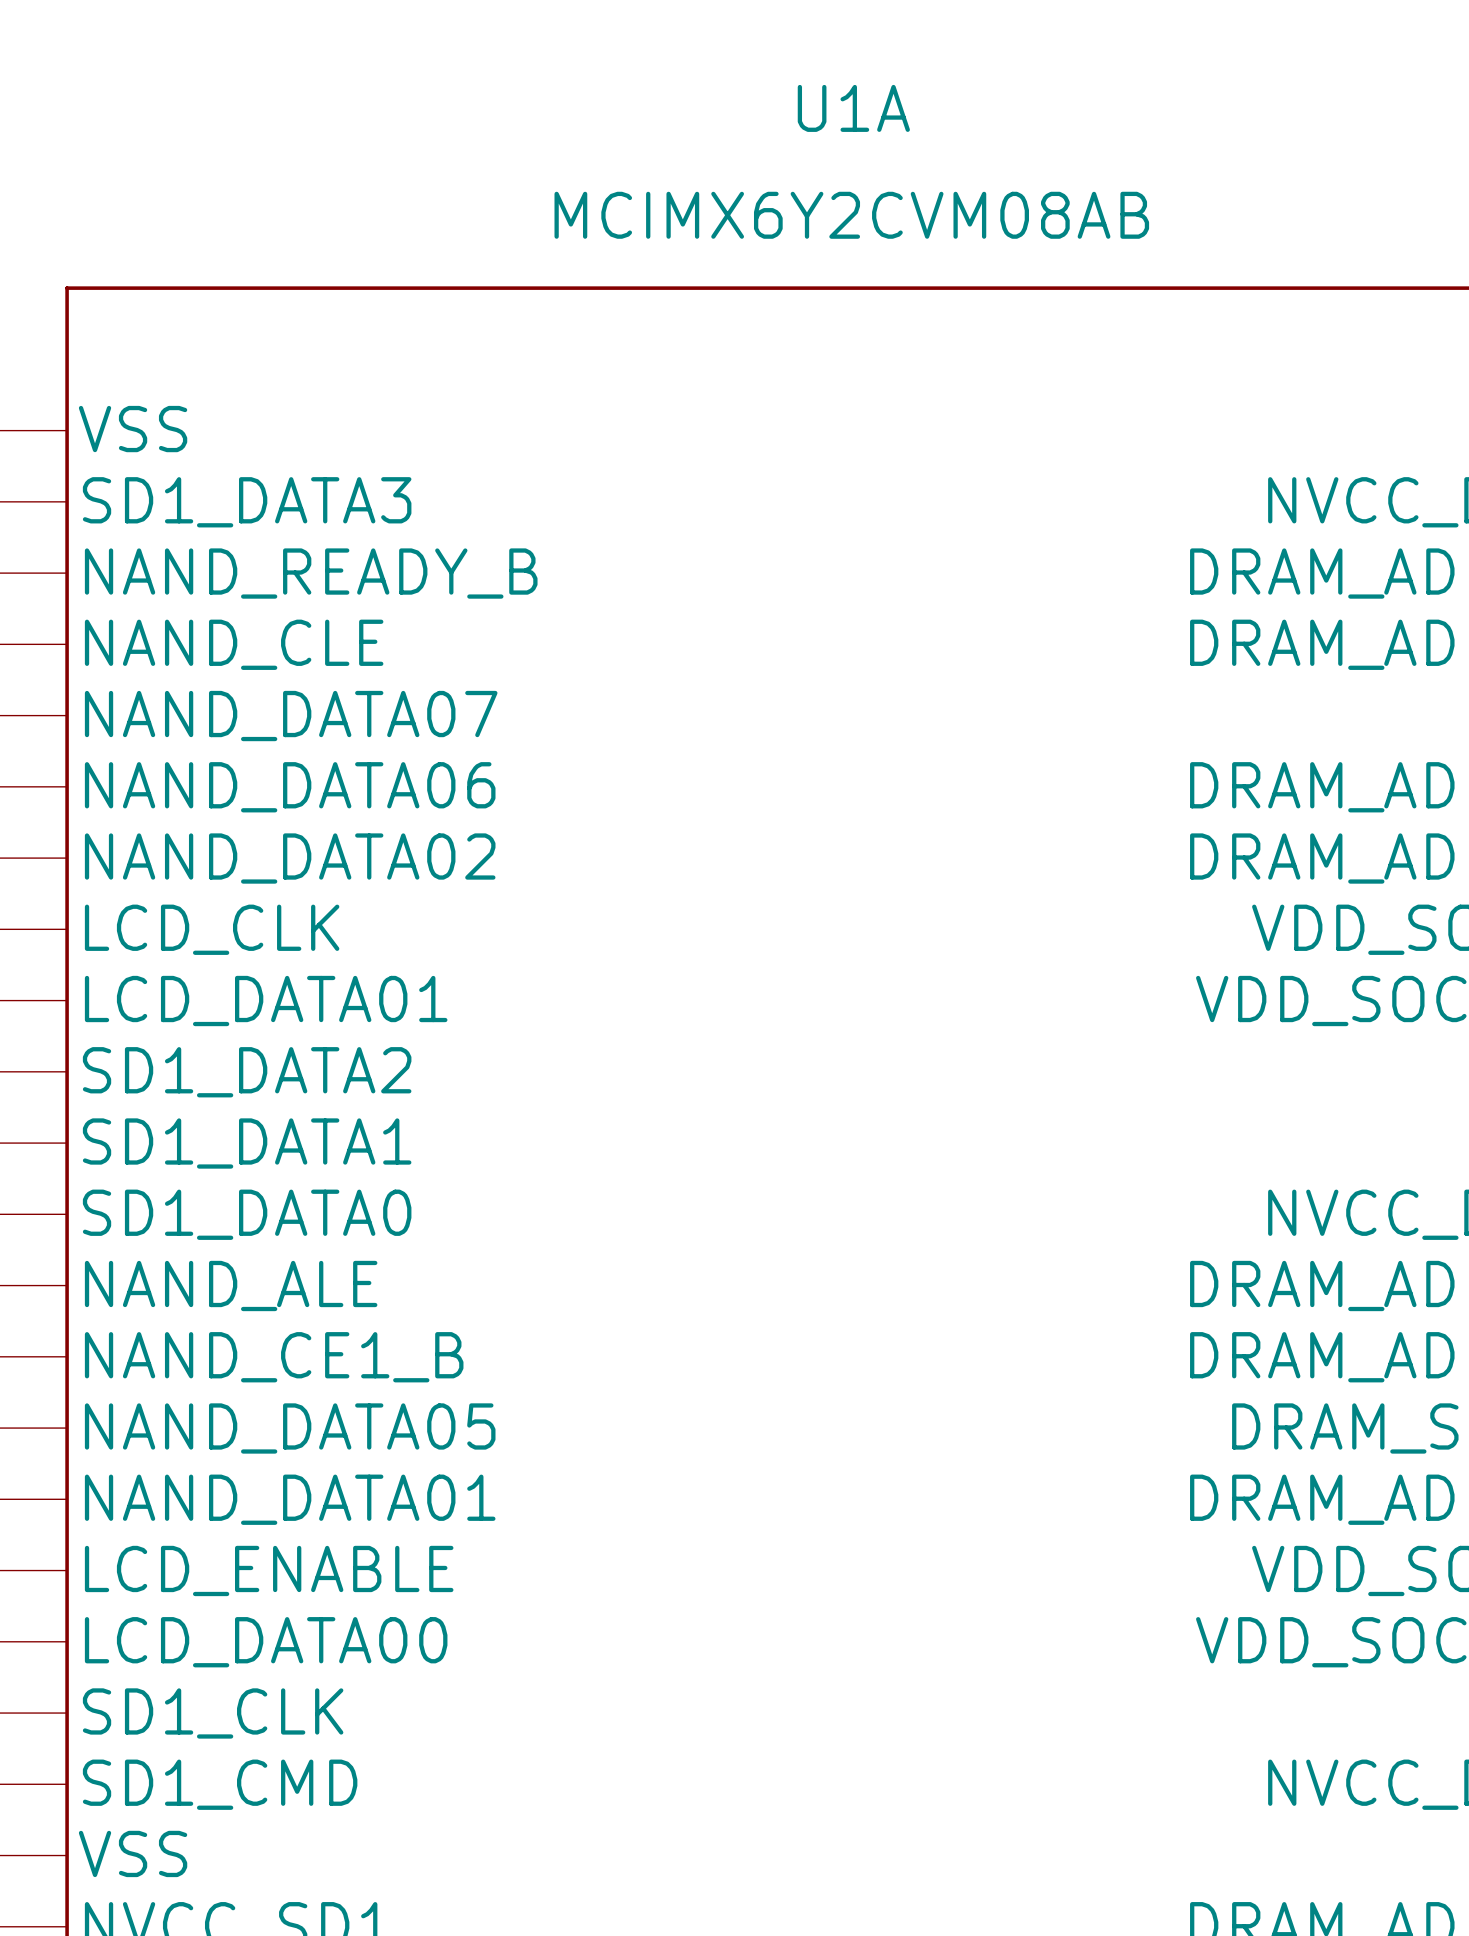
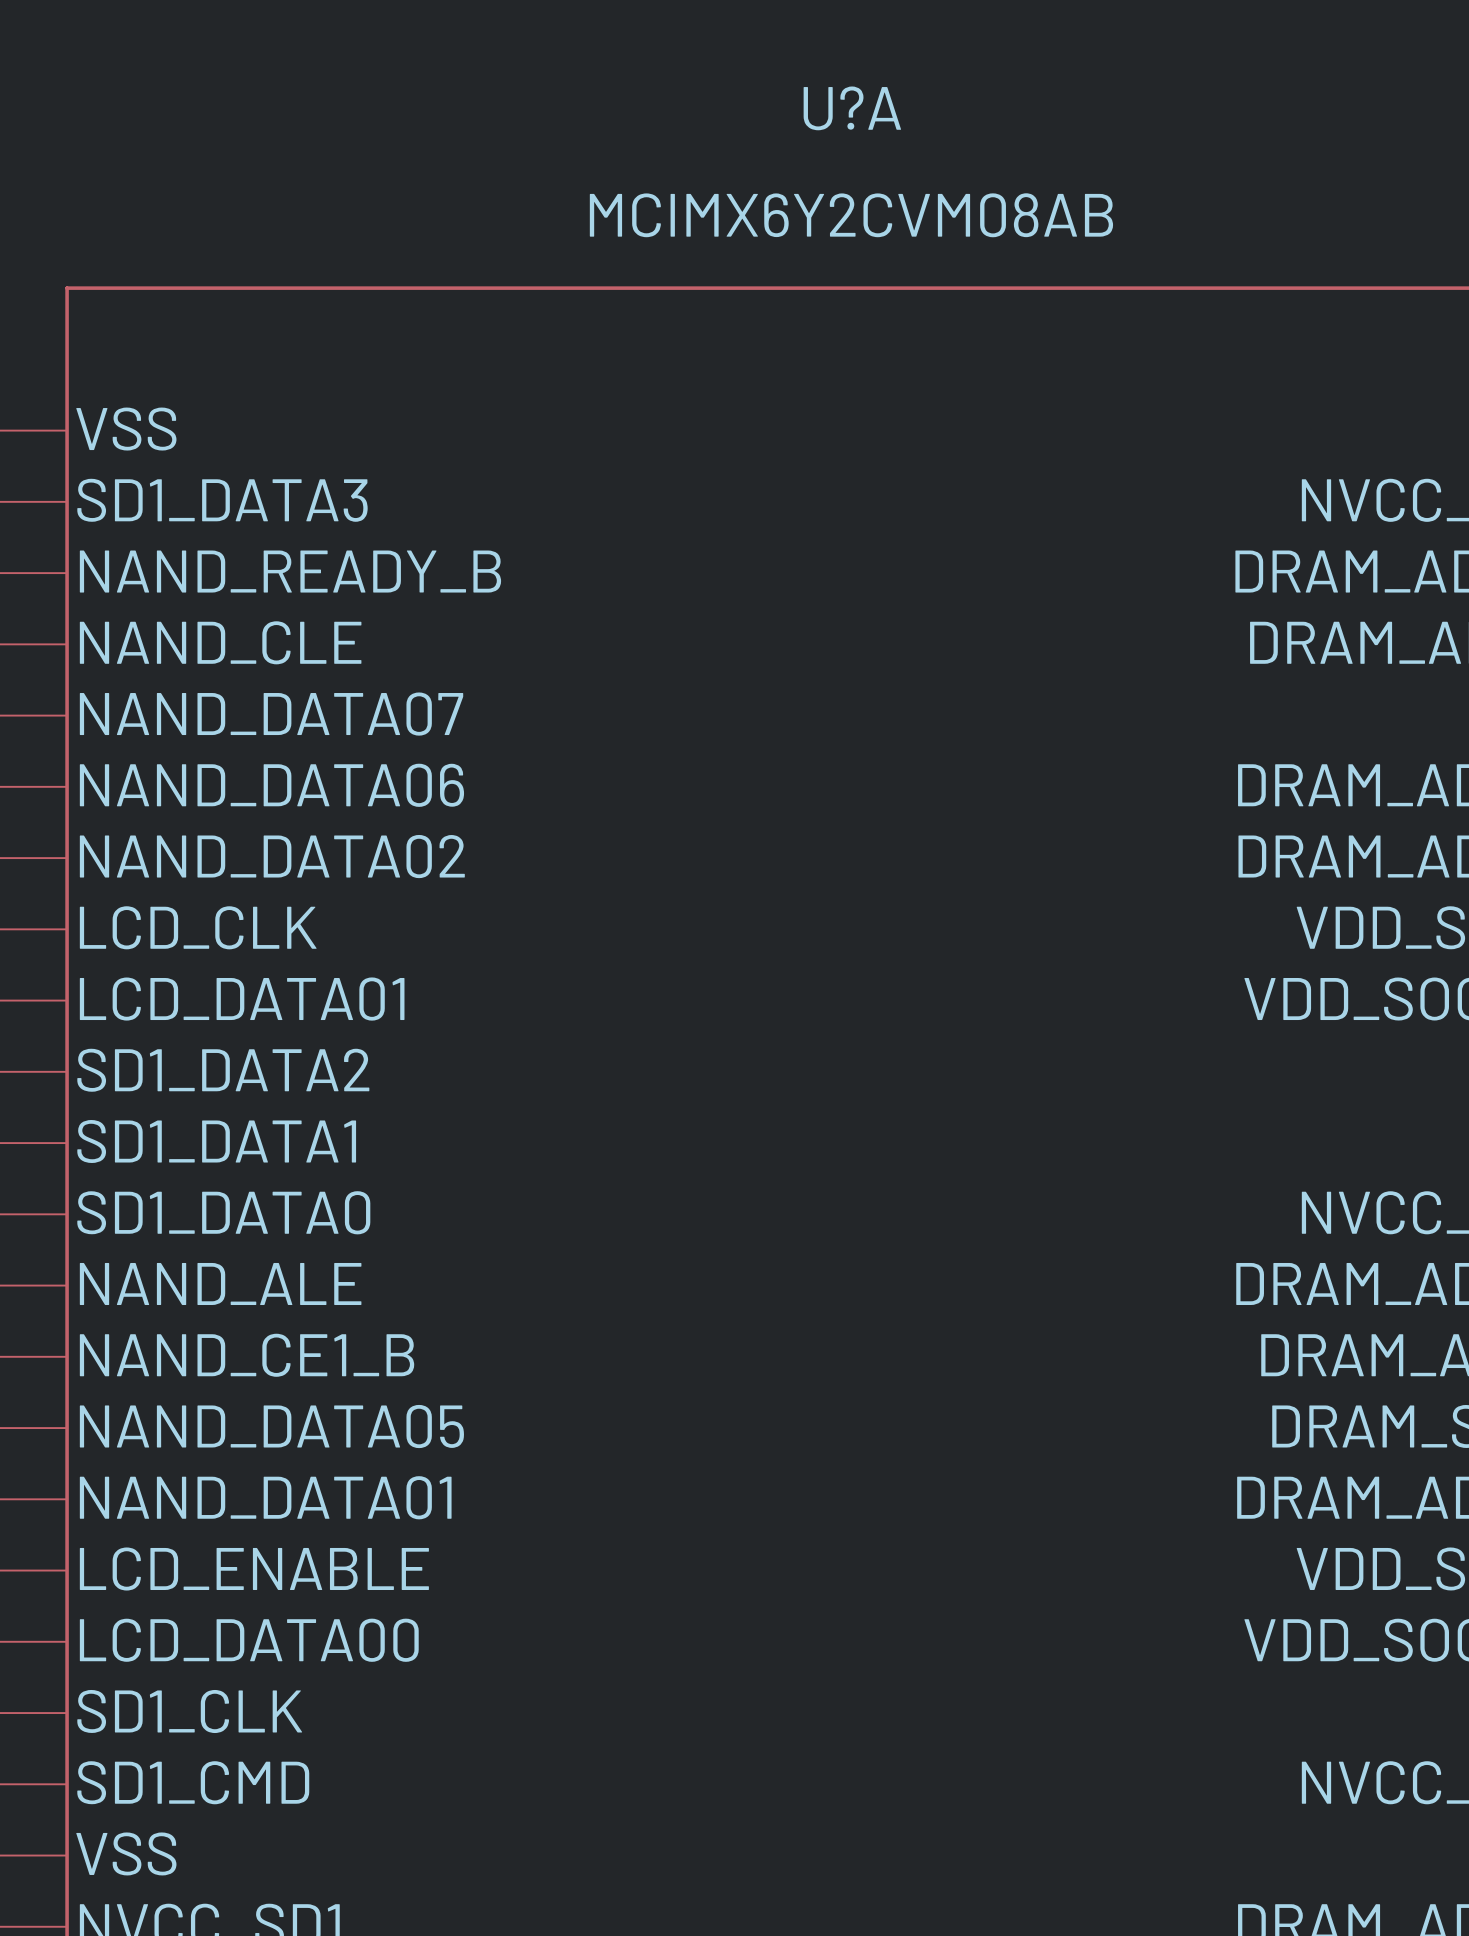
U1A name: U1A (853, 108) -> U?A (852, 108)

